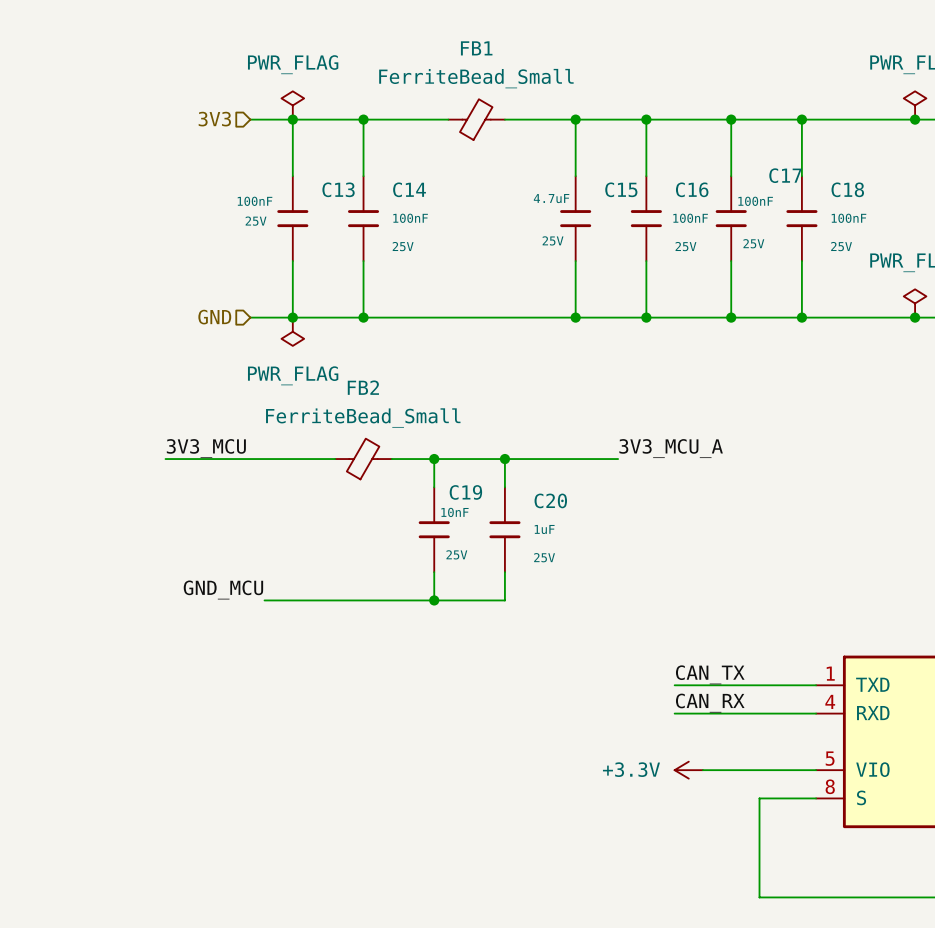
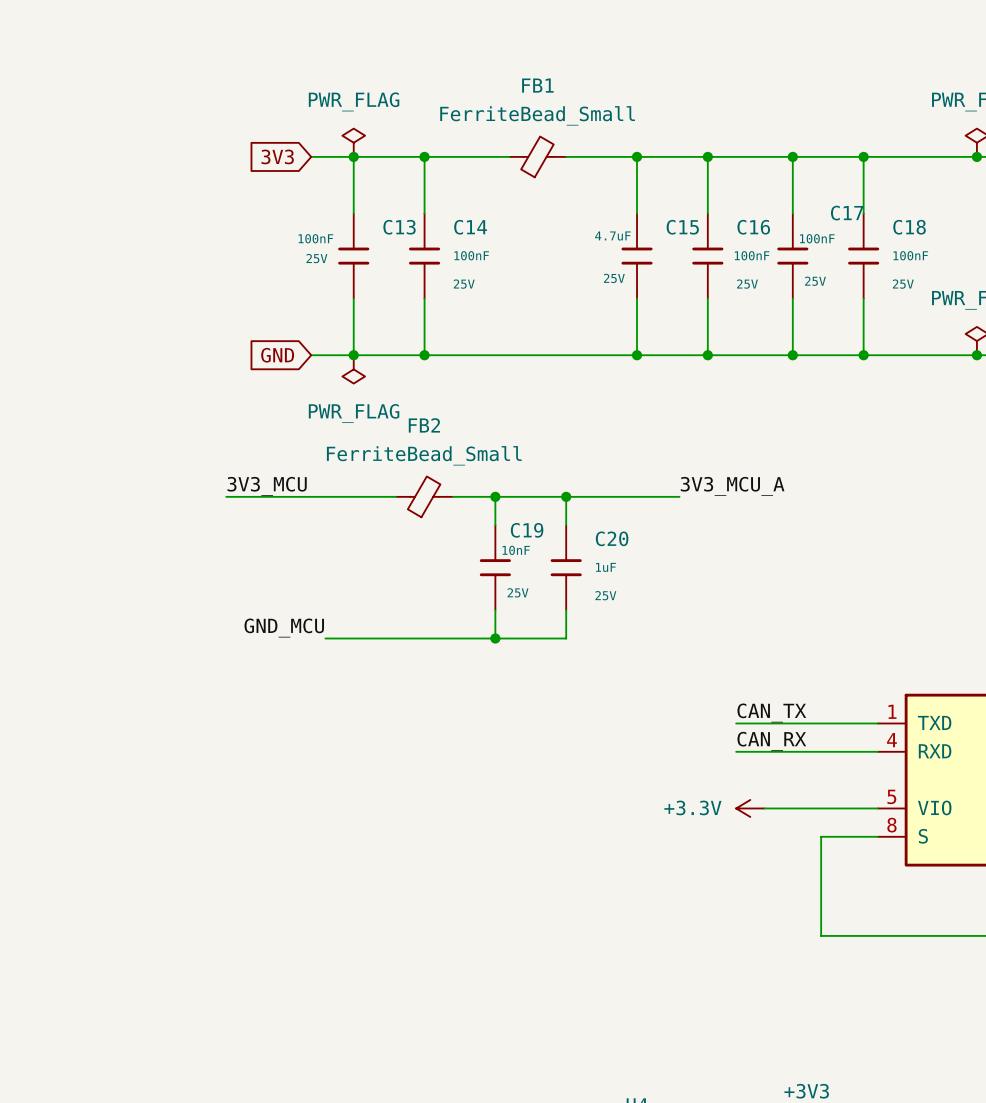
hierarchical label: 3V3 (214, 119) -> none
global label: none -> 3V3 (277, 156)
hierarchical label: GND (214, 317) -> none
global label: none -> GND (277, 355)

